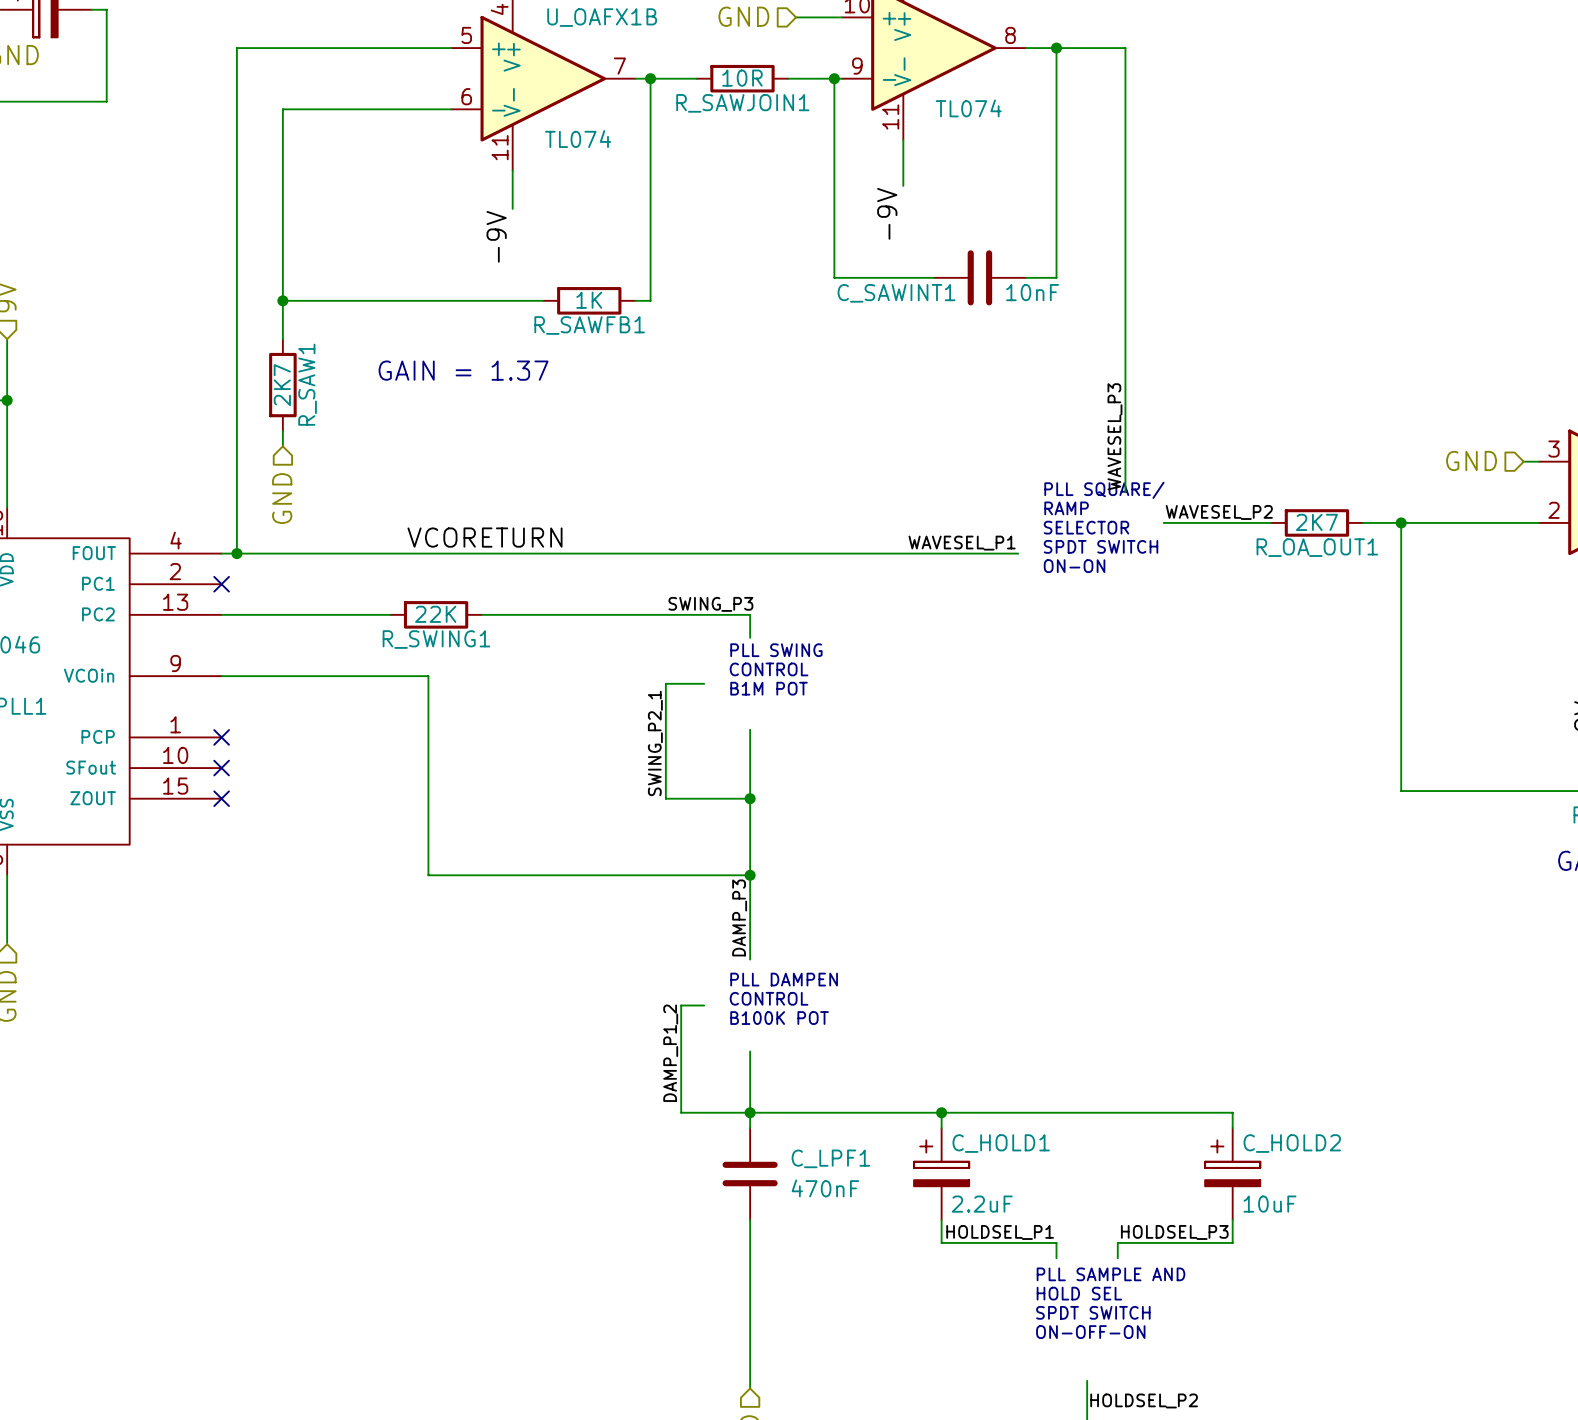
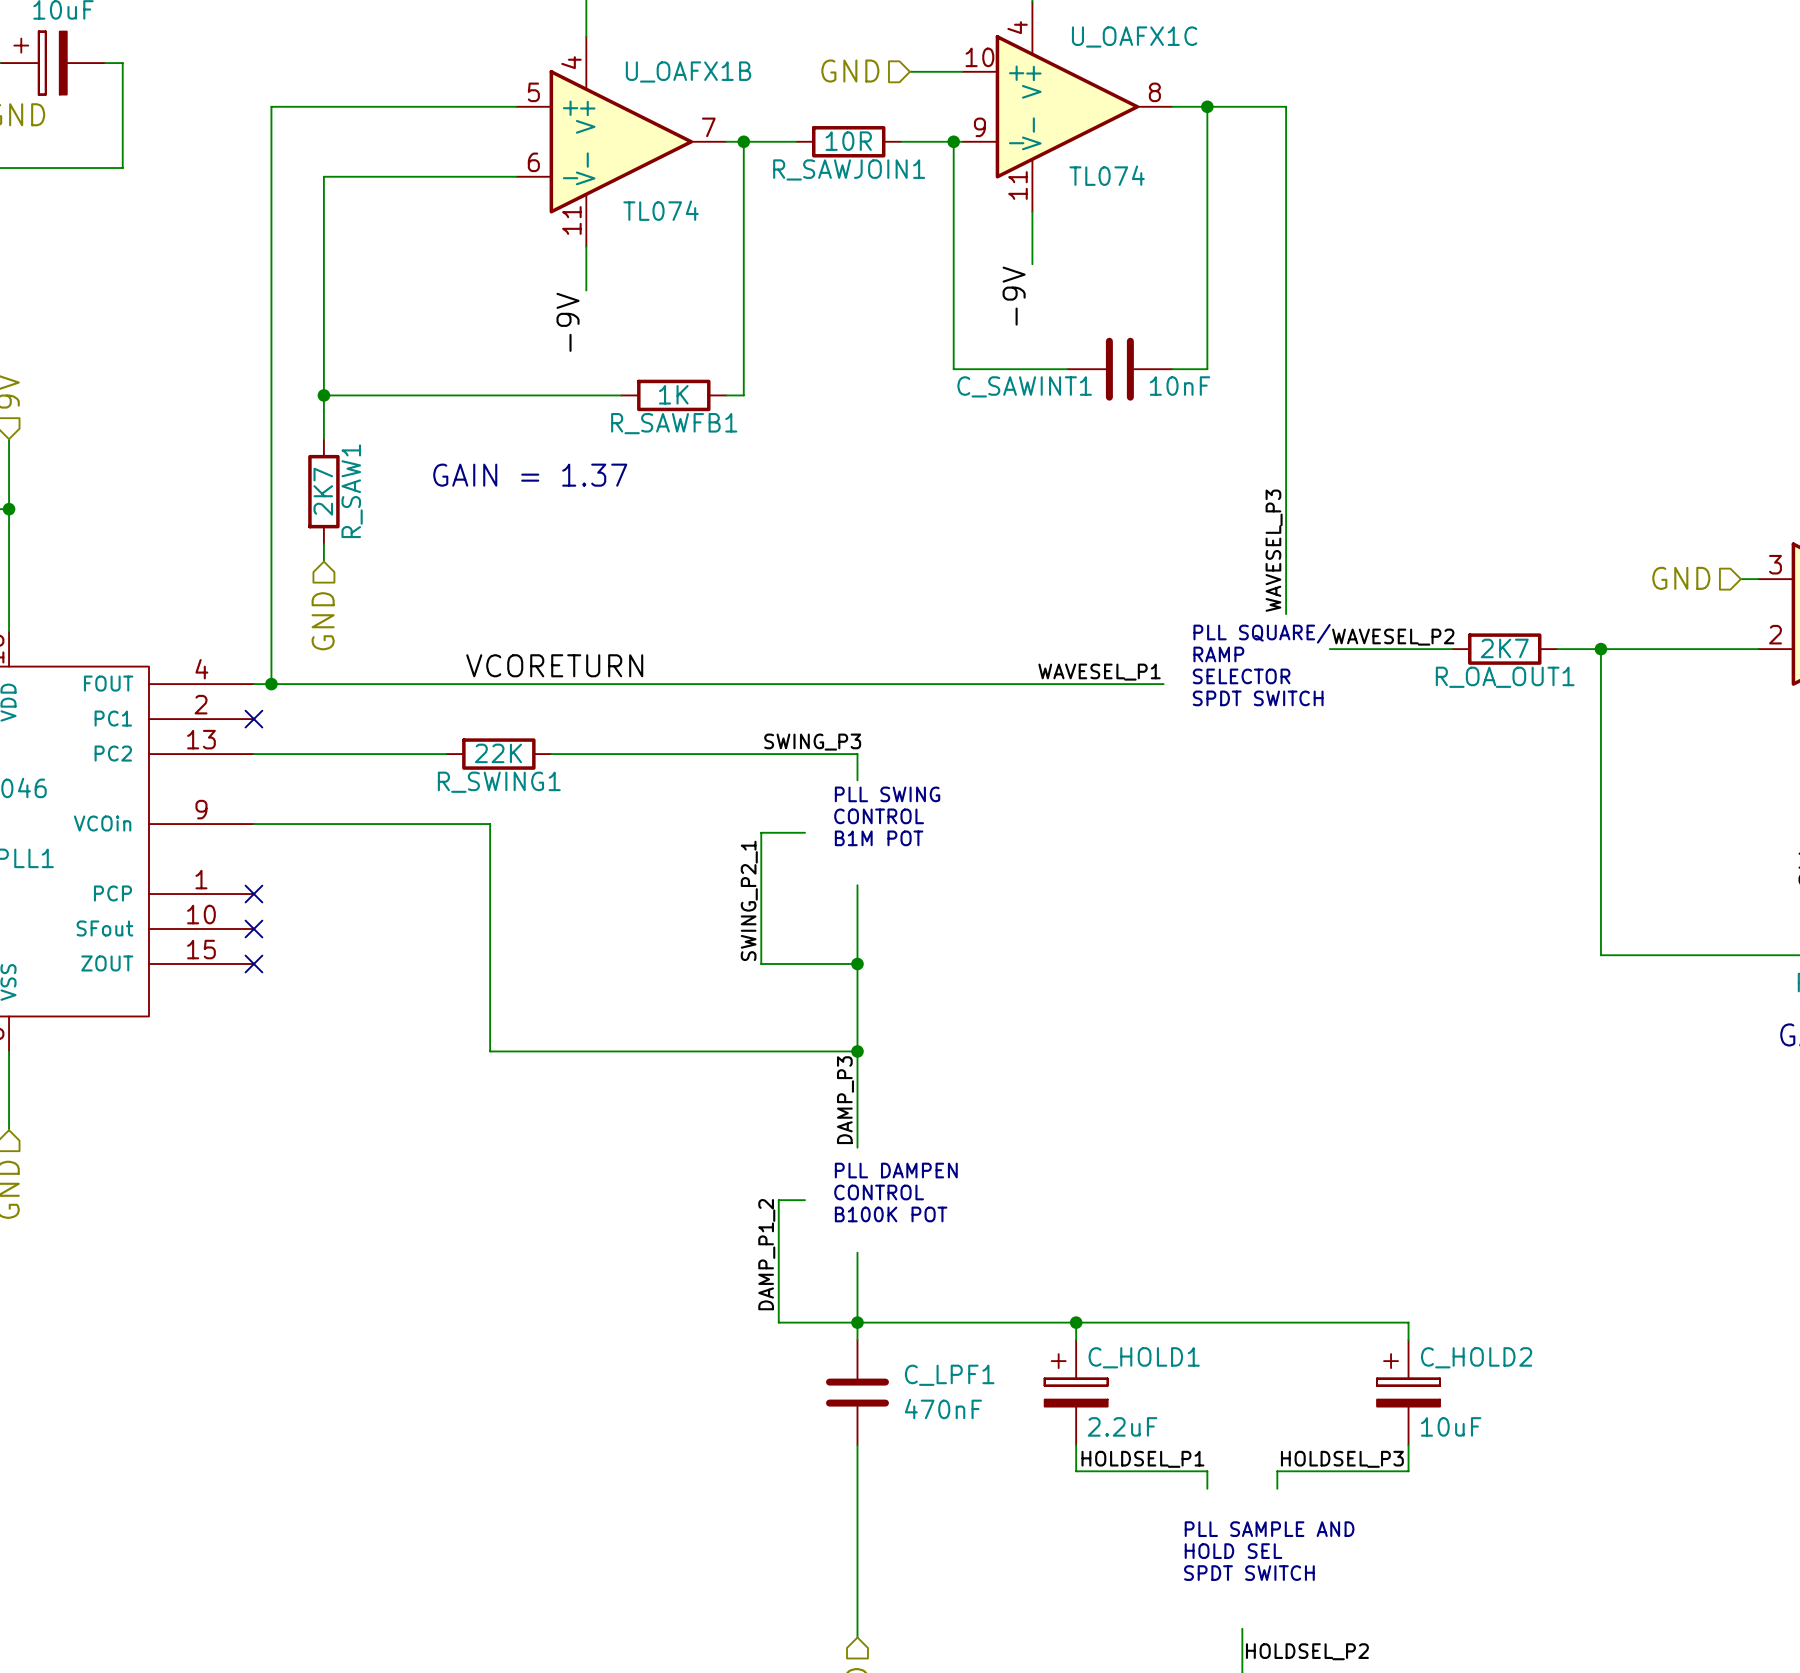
text: PLL SQUARE/ (1104, 490) -> none
text: RAMP (1066, 508) -> PLL SQUARE/ (1262, 633)
text: SELECTOR (1086, 527) -> RAMP (1218, 654)
text: SPDT SWITCH (1101, 546) -> SELECTOR (1241, 676)
text: ON-ON (1074, 566) -> SPDT SWITCH (1258, 698)
text: PLL SAMPLE AND (1110, 1274) -> none
text: HOLD SEL (1079, 1293) -> PLL SAMPLE AND (1269, 1529)
text: SPDT SWITCH (1093, 1312) -> HOLD SEL (1233, 1551)
text: ON-OFF-ON (1090, 1332) -> SPDT SWITCH (1249, 1573)

